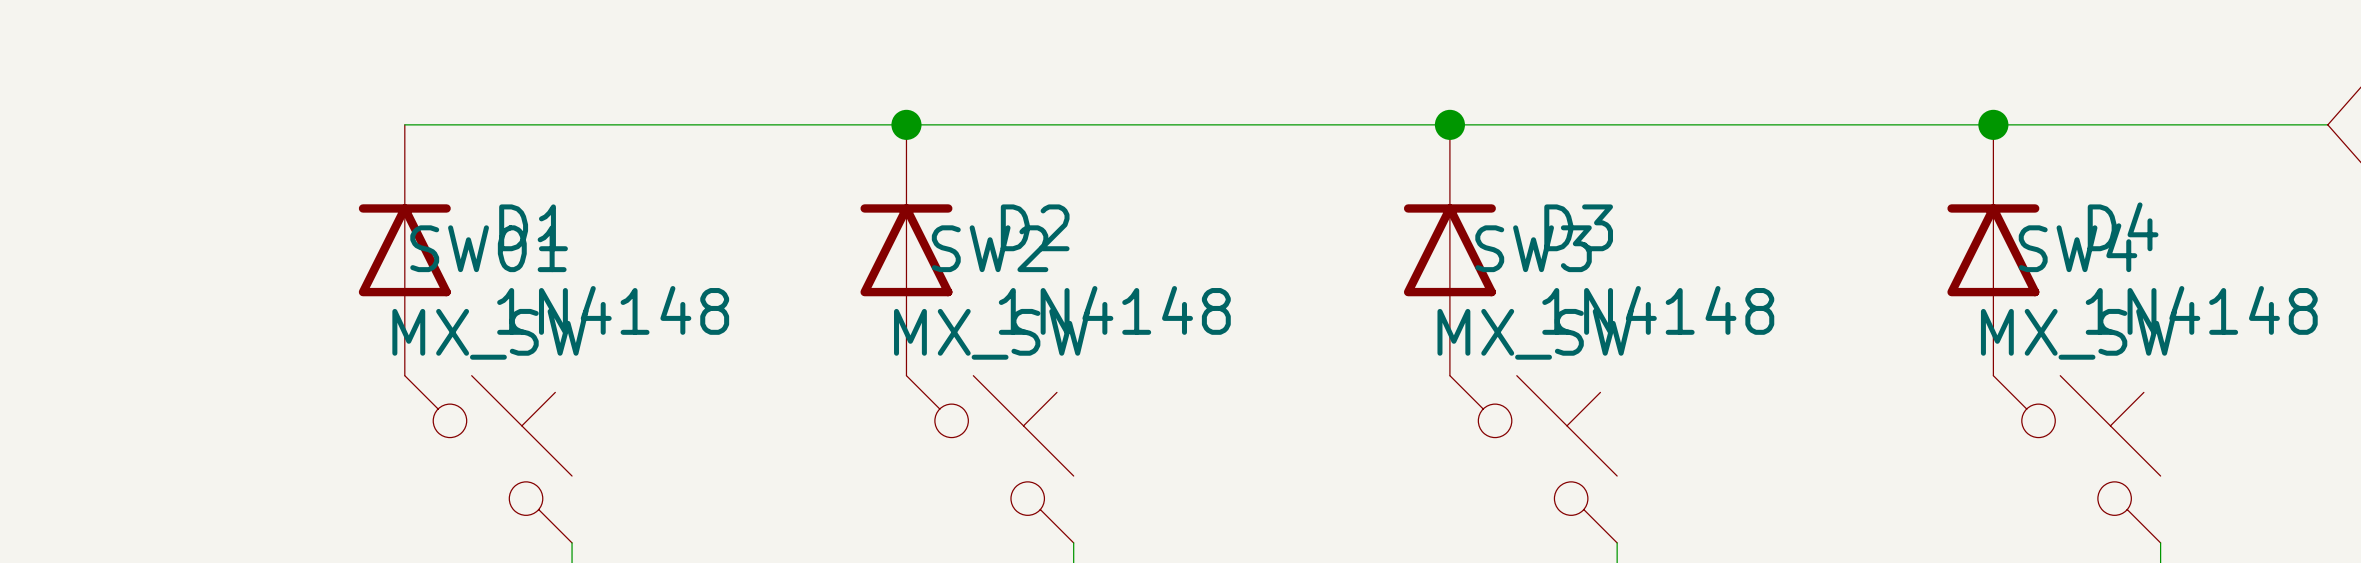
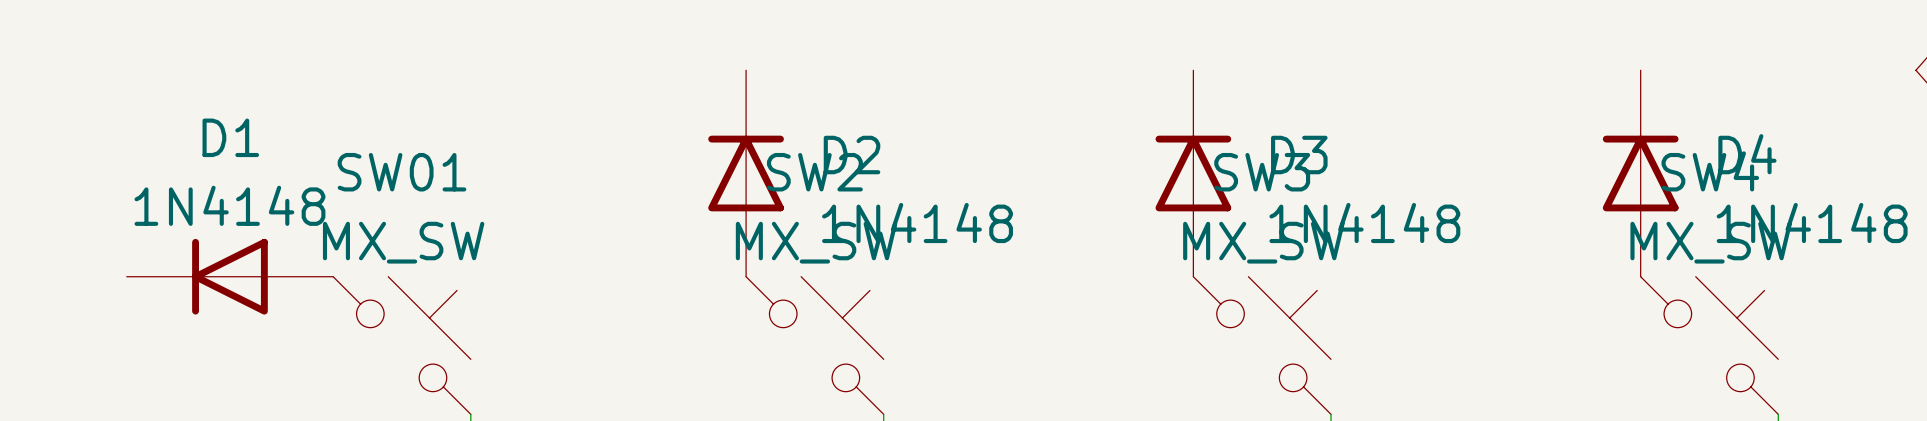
wire: (404, 124) (2327, 124) -> none
junction: (906, 124) -> none
junction: (1449, 124) -> none
junction: (1993, 124) -> none
D1 rotation: 0° (404, 250) -> 90° counterclockwise (229, 276)
D1 position: (404, 250) -> (229, 276)
D1 value position: 1N4148 (613, 310) -> 1N4148 (229, 205)

